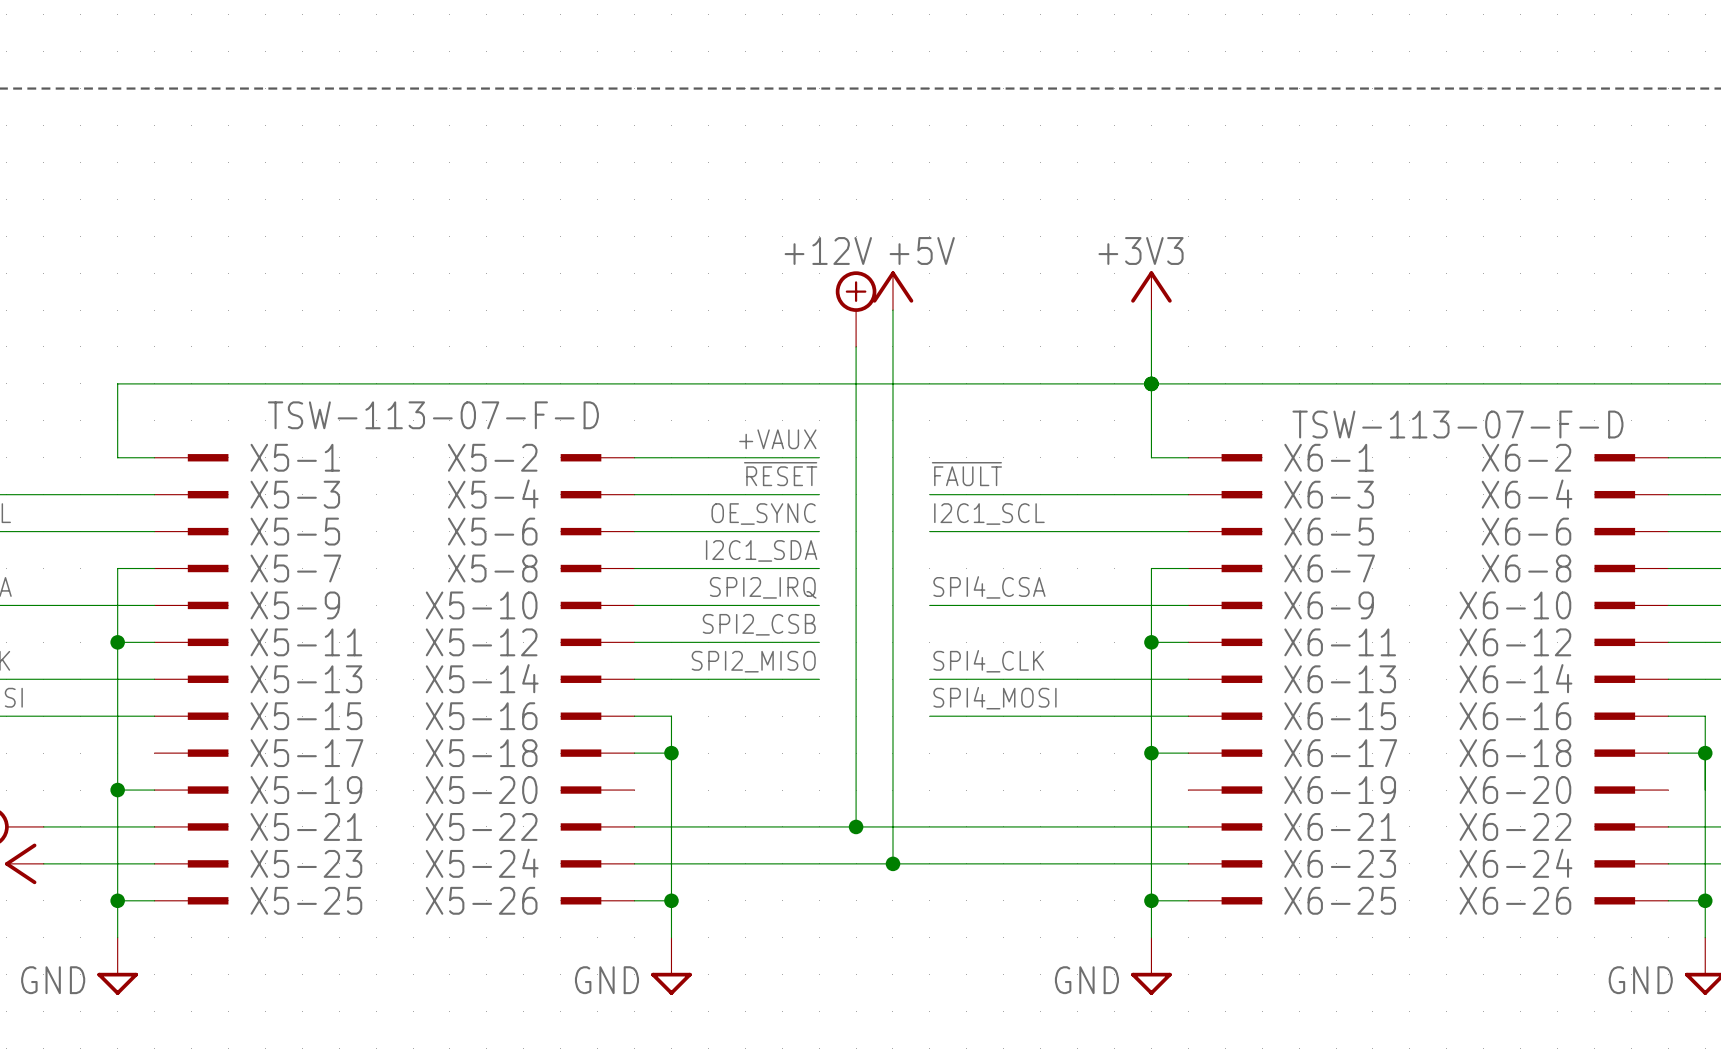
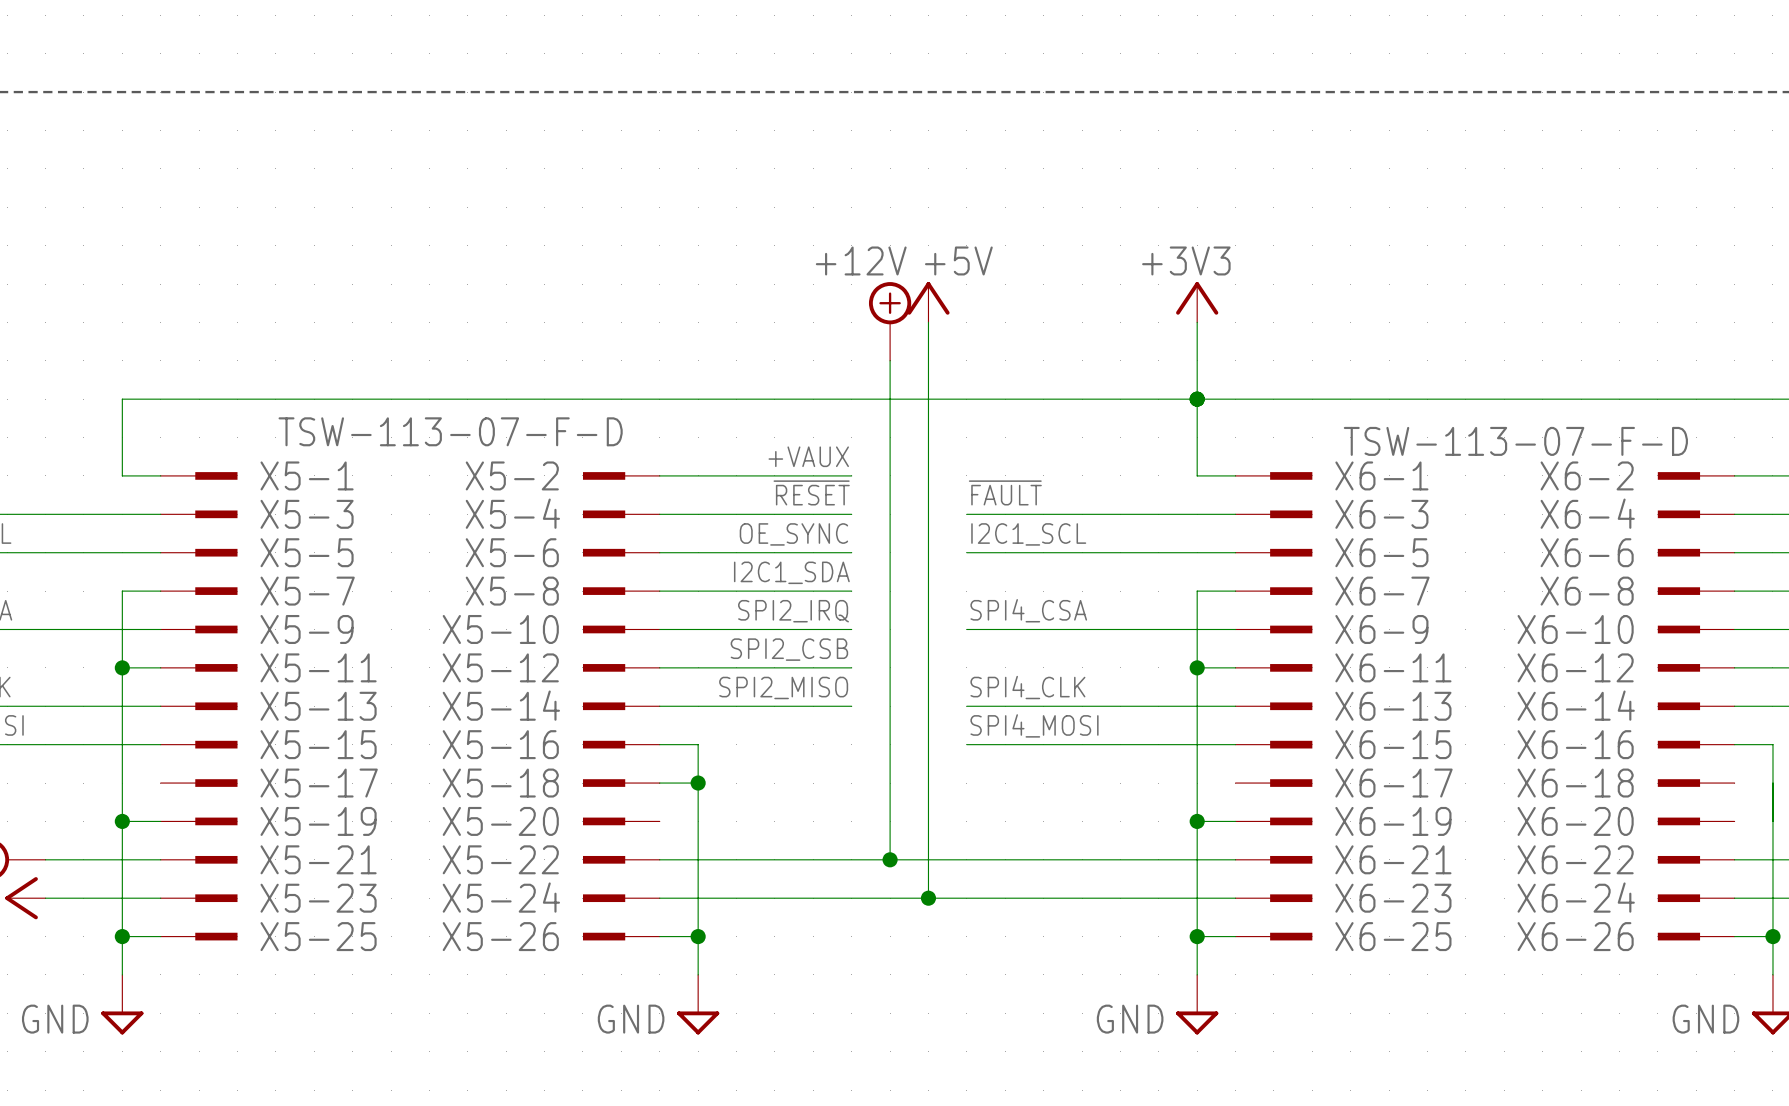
wire: (1151, 753) (1188, 753) -> (1197, 821) (1235, 821)
junction position: (1151, 753) -> (1197, 821)
wire: (1668, 753) (1705, 753) -> none
junction: (1705, 753) -> none

